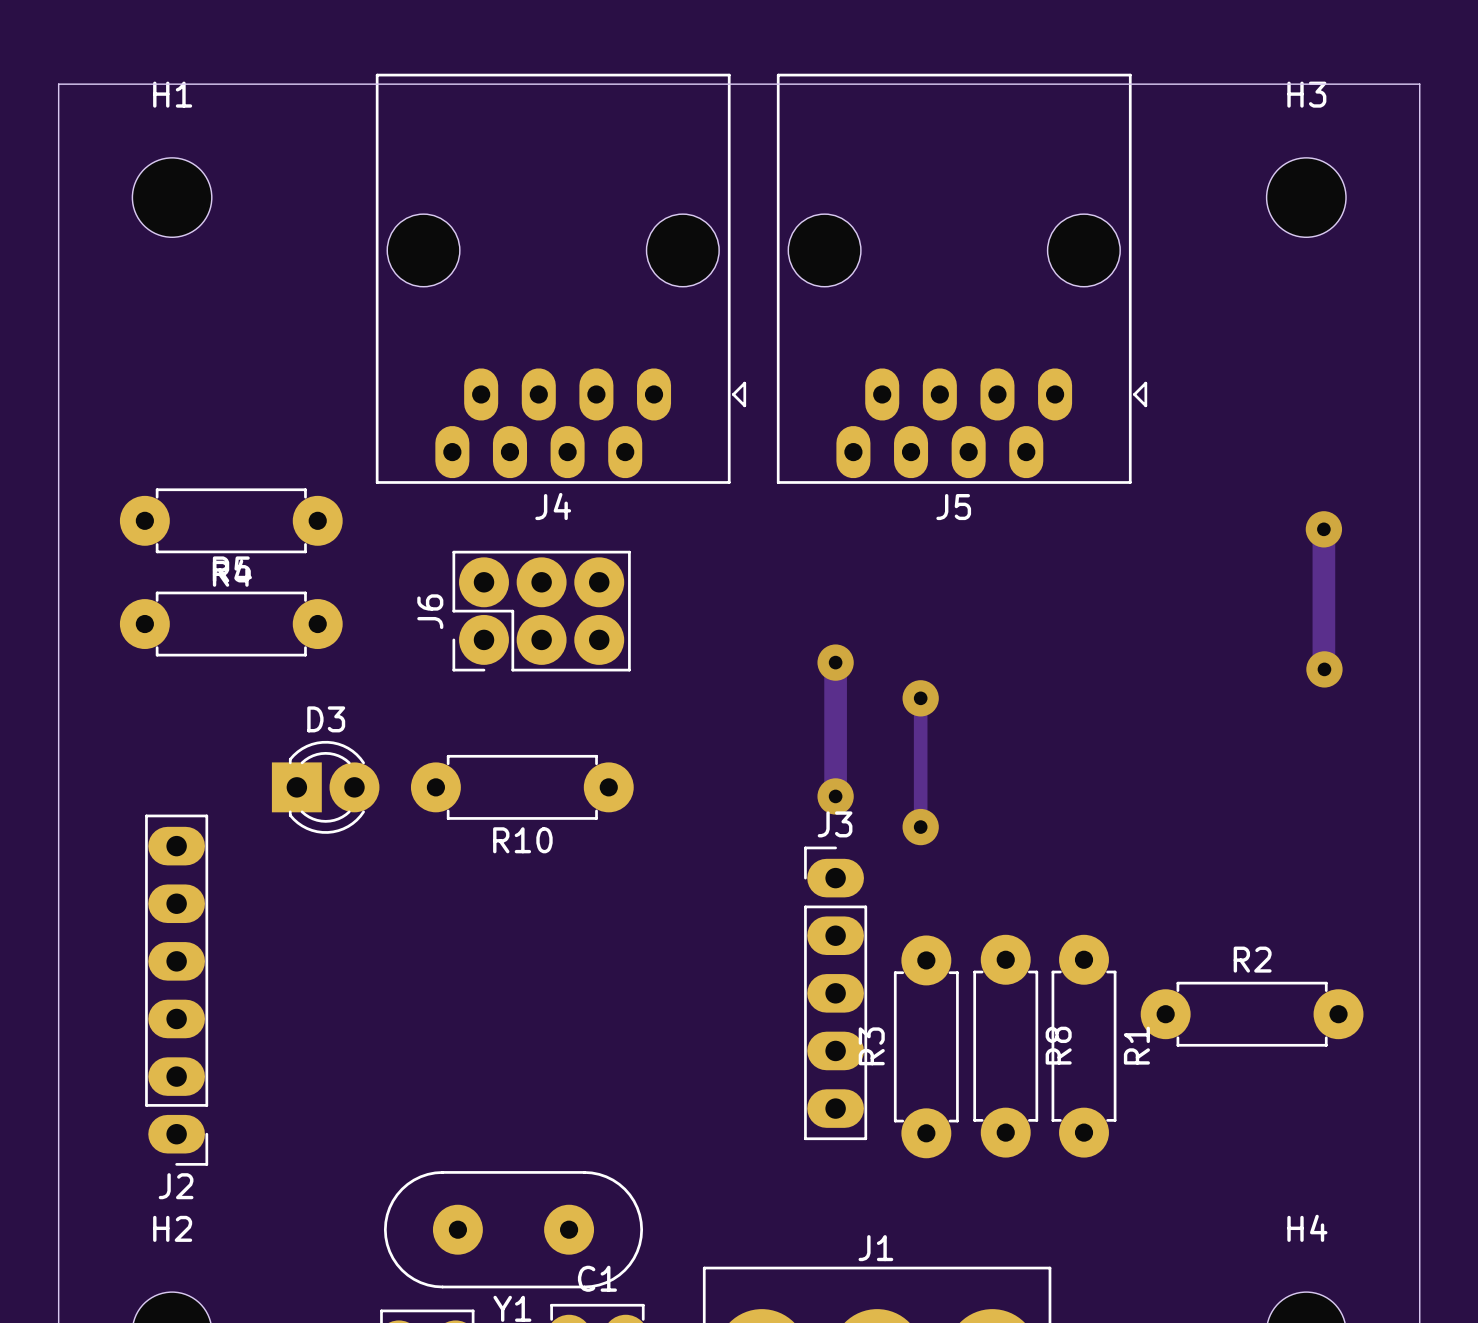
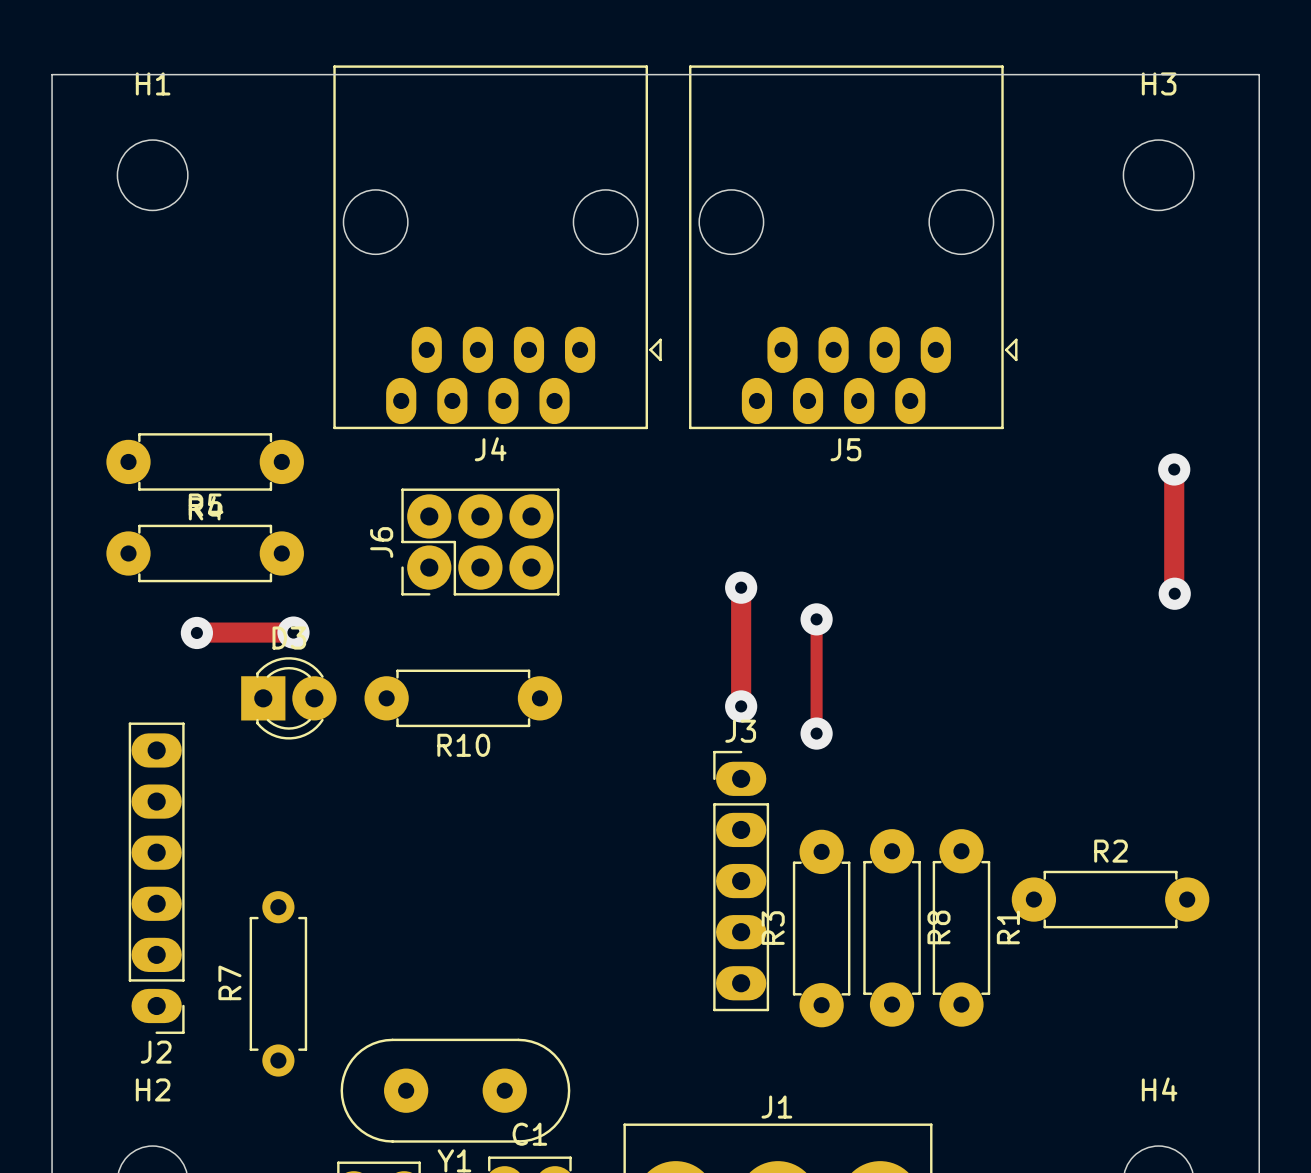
via: none -> (196, 632)
track: none -> (293, 632) (196, 632)
via: none -> (293, 632)
R7: none -> (278, 983)

